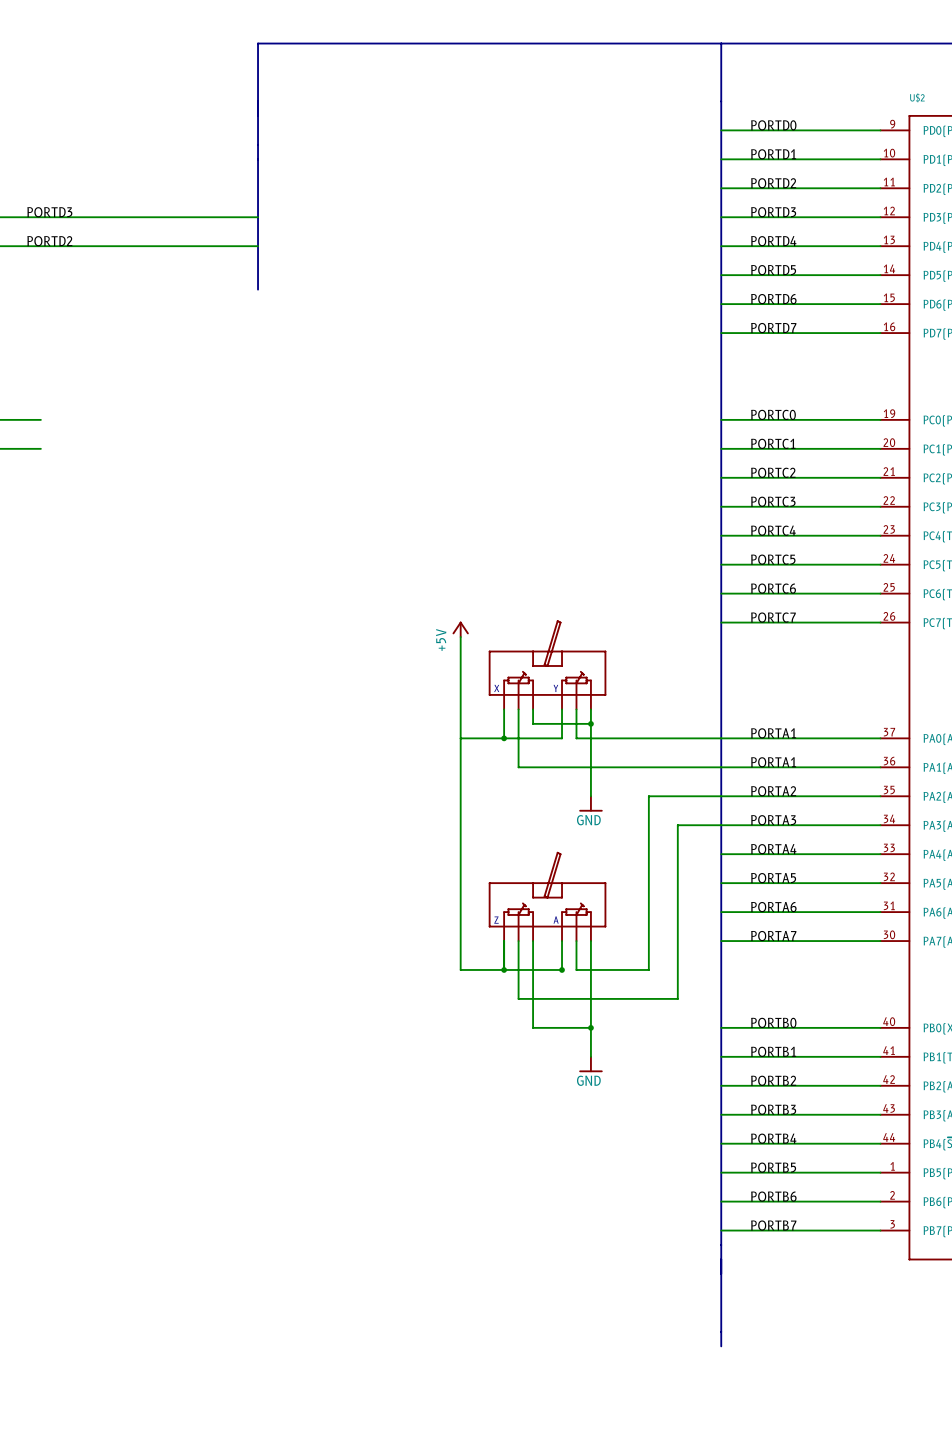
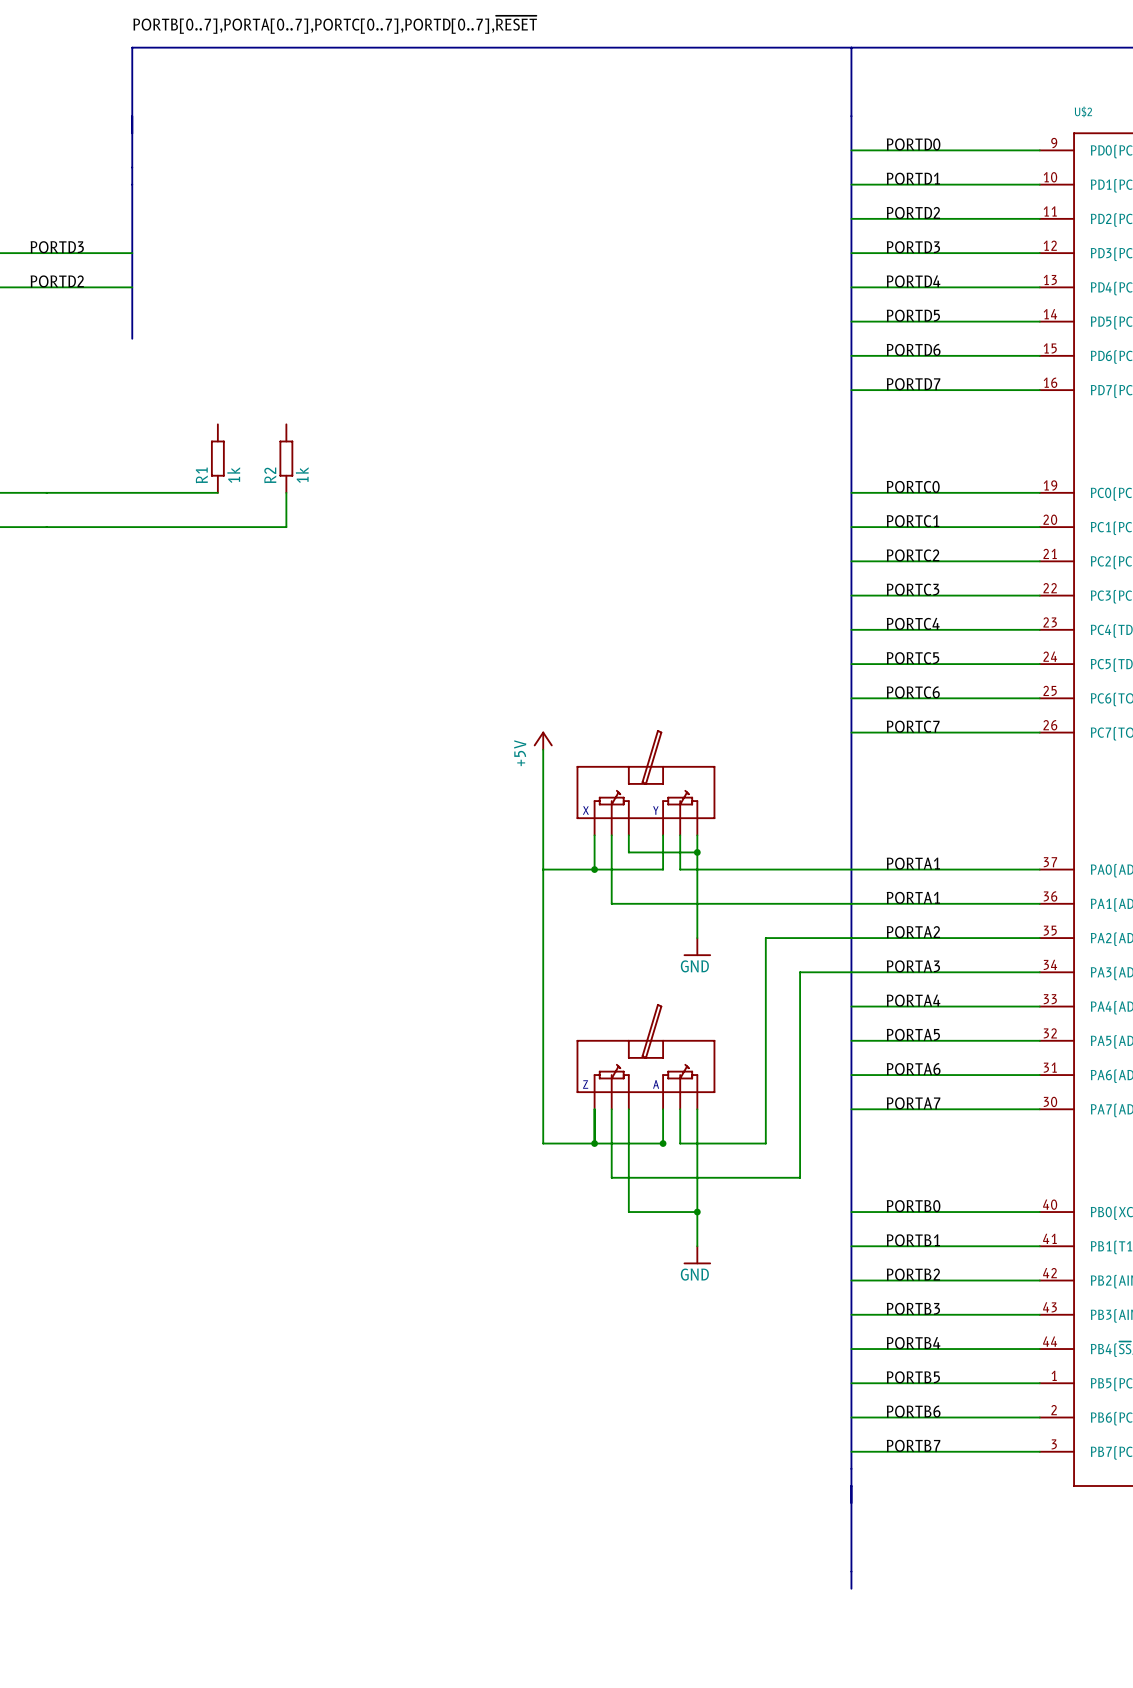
label: none -> PORTB[0..7],PORTA[0..7],PORTC[0..7],PORTD[0..7],~{RESET} (335, 24)
bus: (258, 43) (258, 289) -> (303, 47) (132, 47) (132, 338)
wire: (113, 217) (258, 217) -> none
wire: (113, 246) (258, 246) -> none
R1: none -> 1k (217, 458)
R2: none -> 1k (286, 458)
wire: none -> (46, 492) (217, 492)
wire: none -> (286, 492) (286, 527) (46, 527)

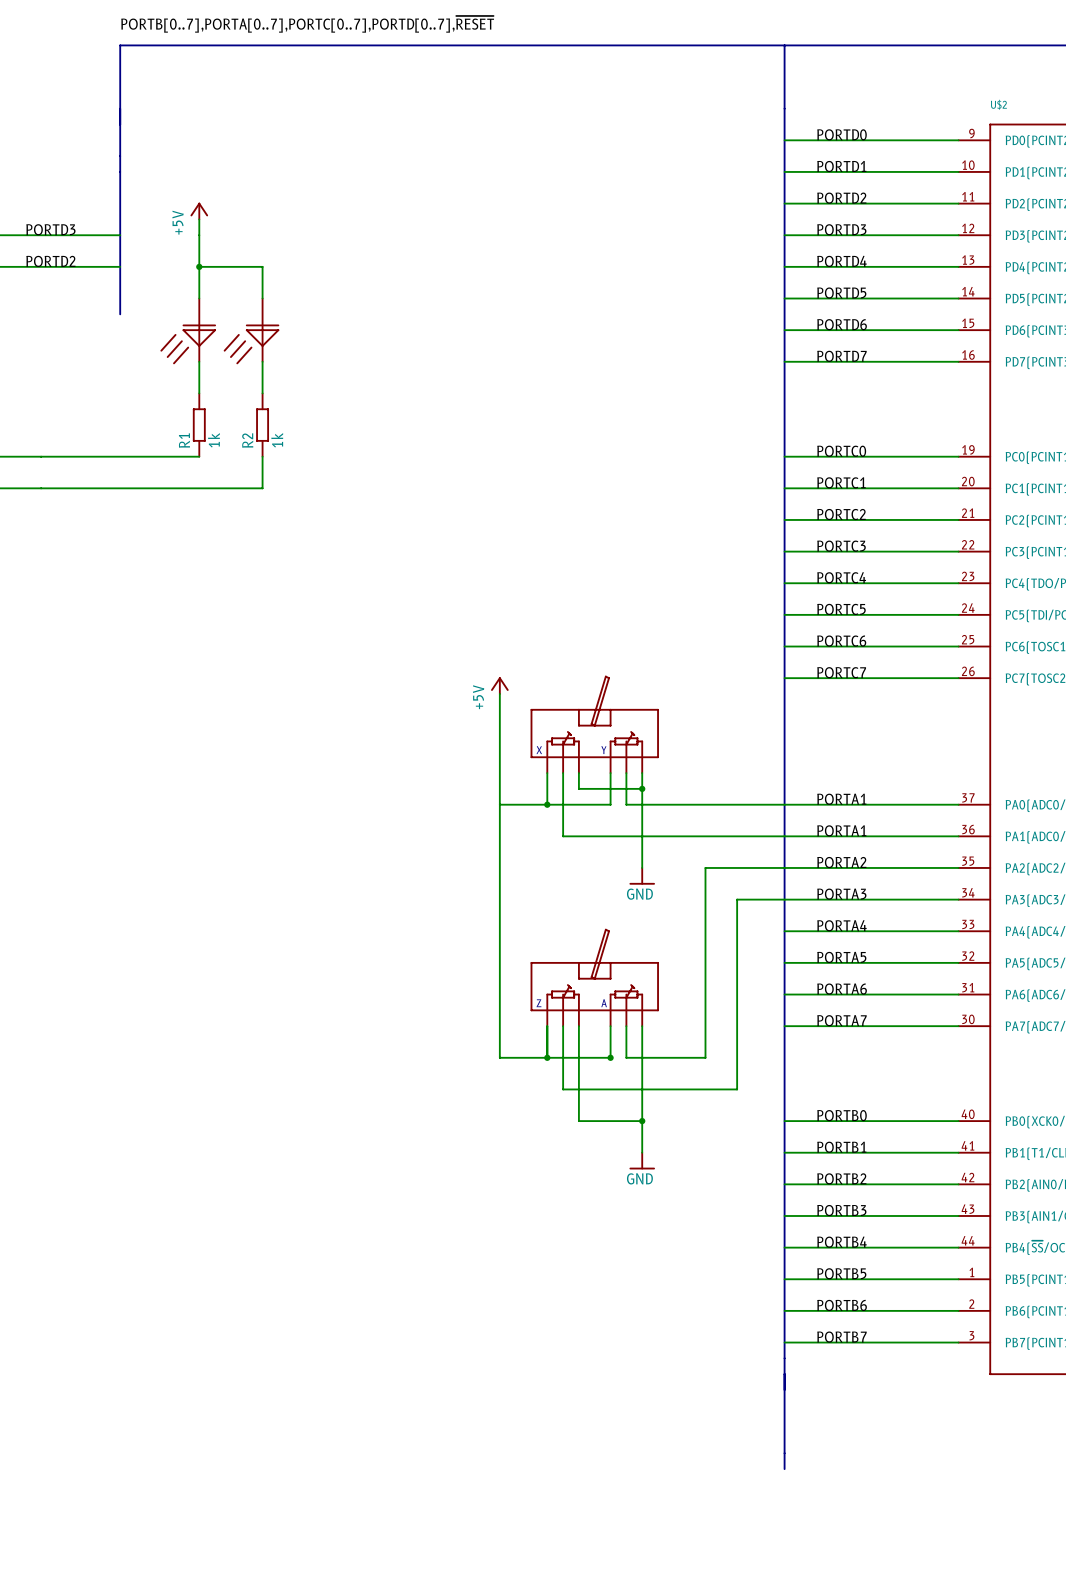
power symbol: none -> +5V (199, 211)
wire: none -> (199, 219) (199, 298)
wire: none -> (199, 266) (262, 266) (262, 298)
junction: none -> (199, 266)
part: none -> (188, 331)
part: none -> (251, 331)
wire: none -> (199, 361) (199, 393)
wire: none -> (262, 361) (262, 393)

